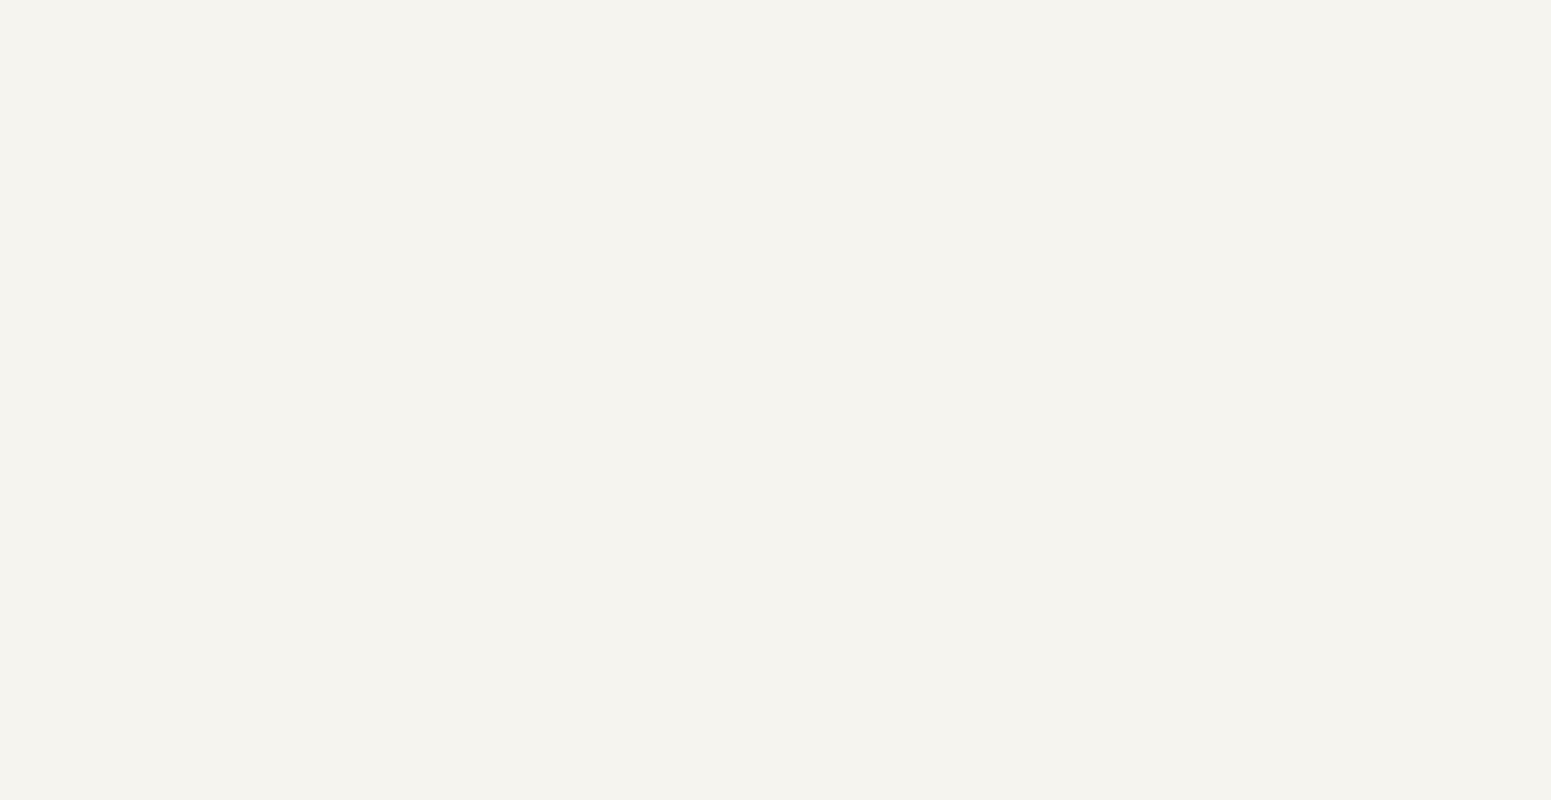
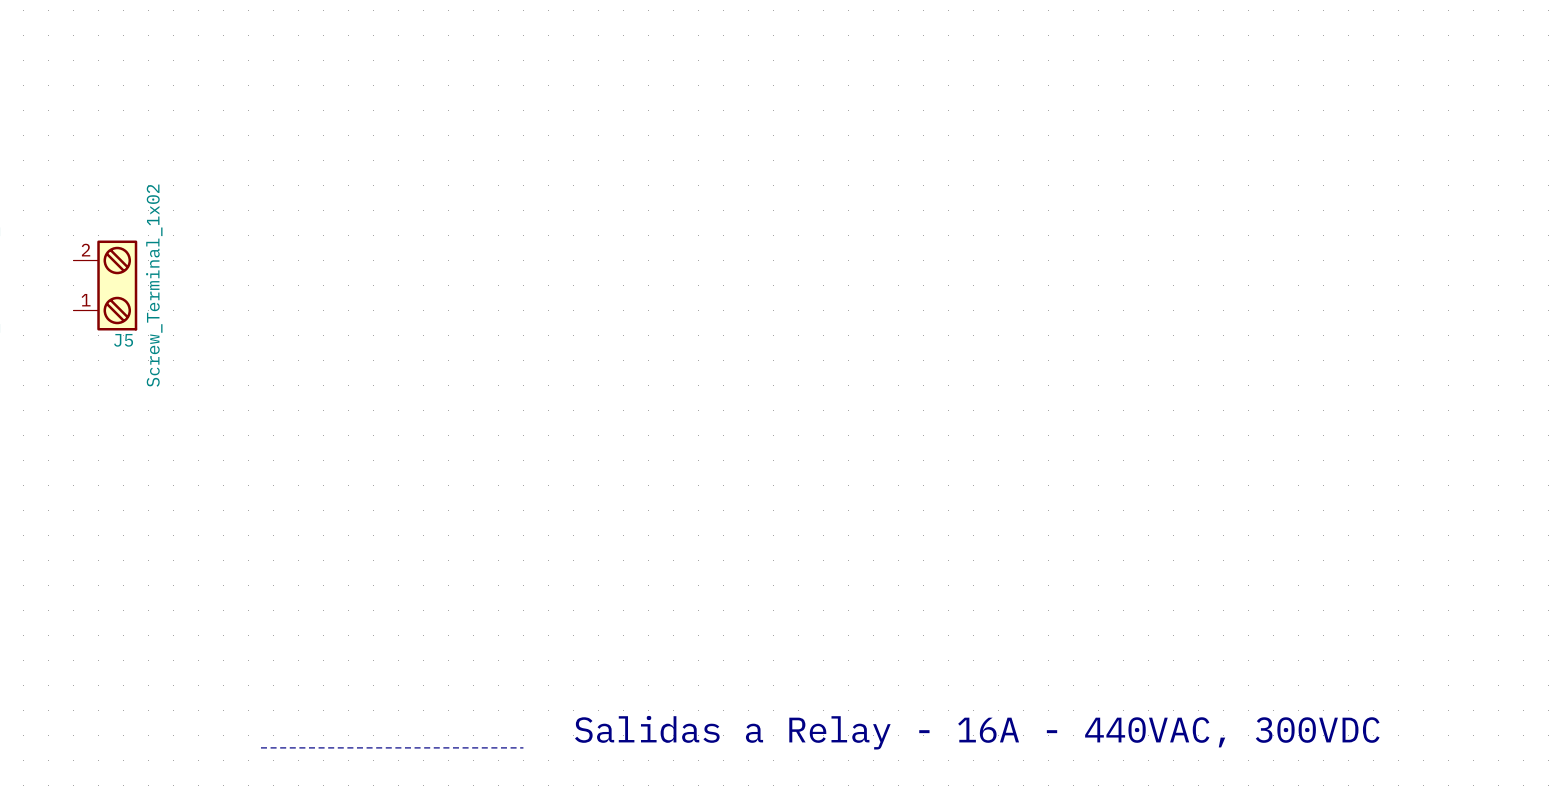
J5: none -> Screw_Terminal_1x02 (105, 285)
text: none -> Salidas a Relay - 16A - 440VAC, 300VDC (977, 732)
line: none -> (260, 747) (523, 747)

